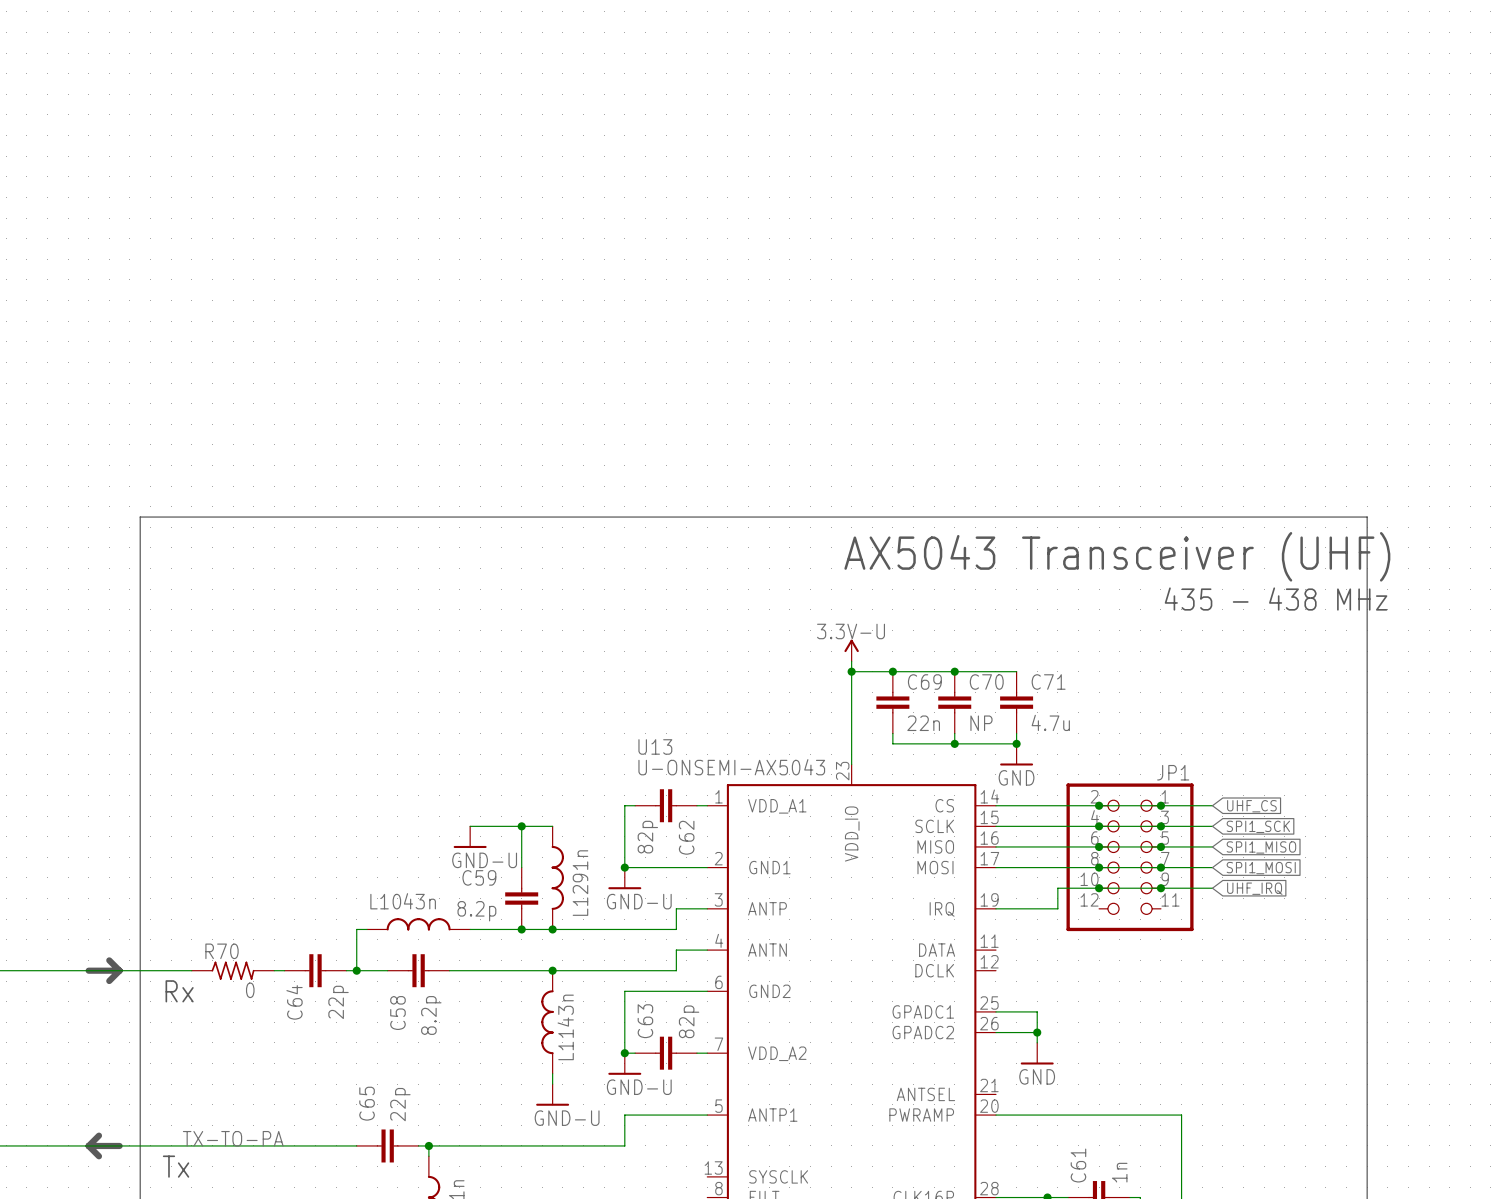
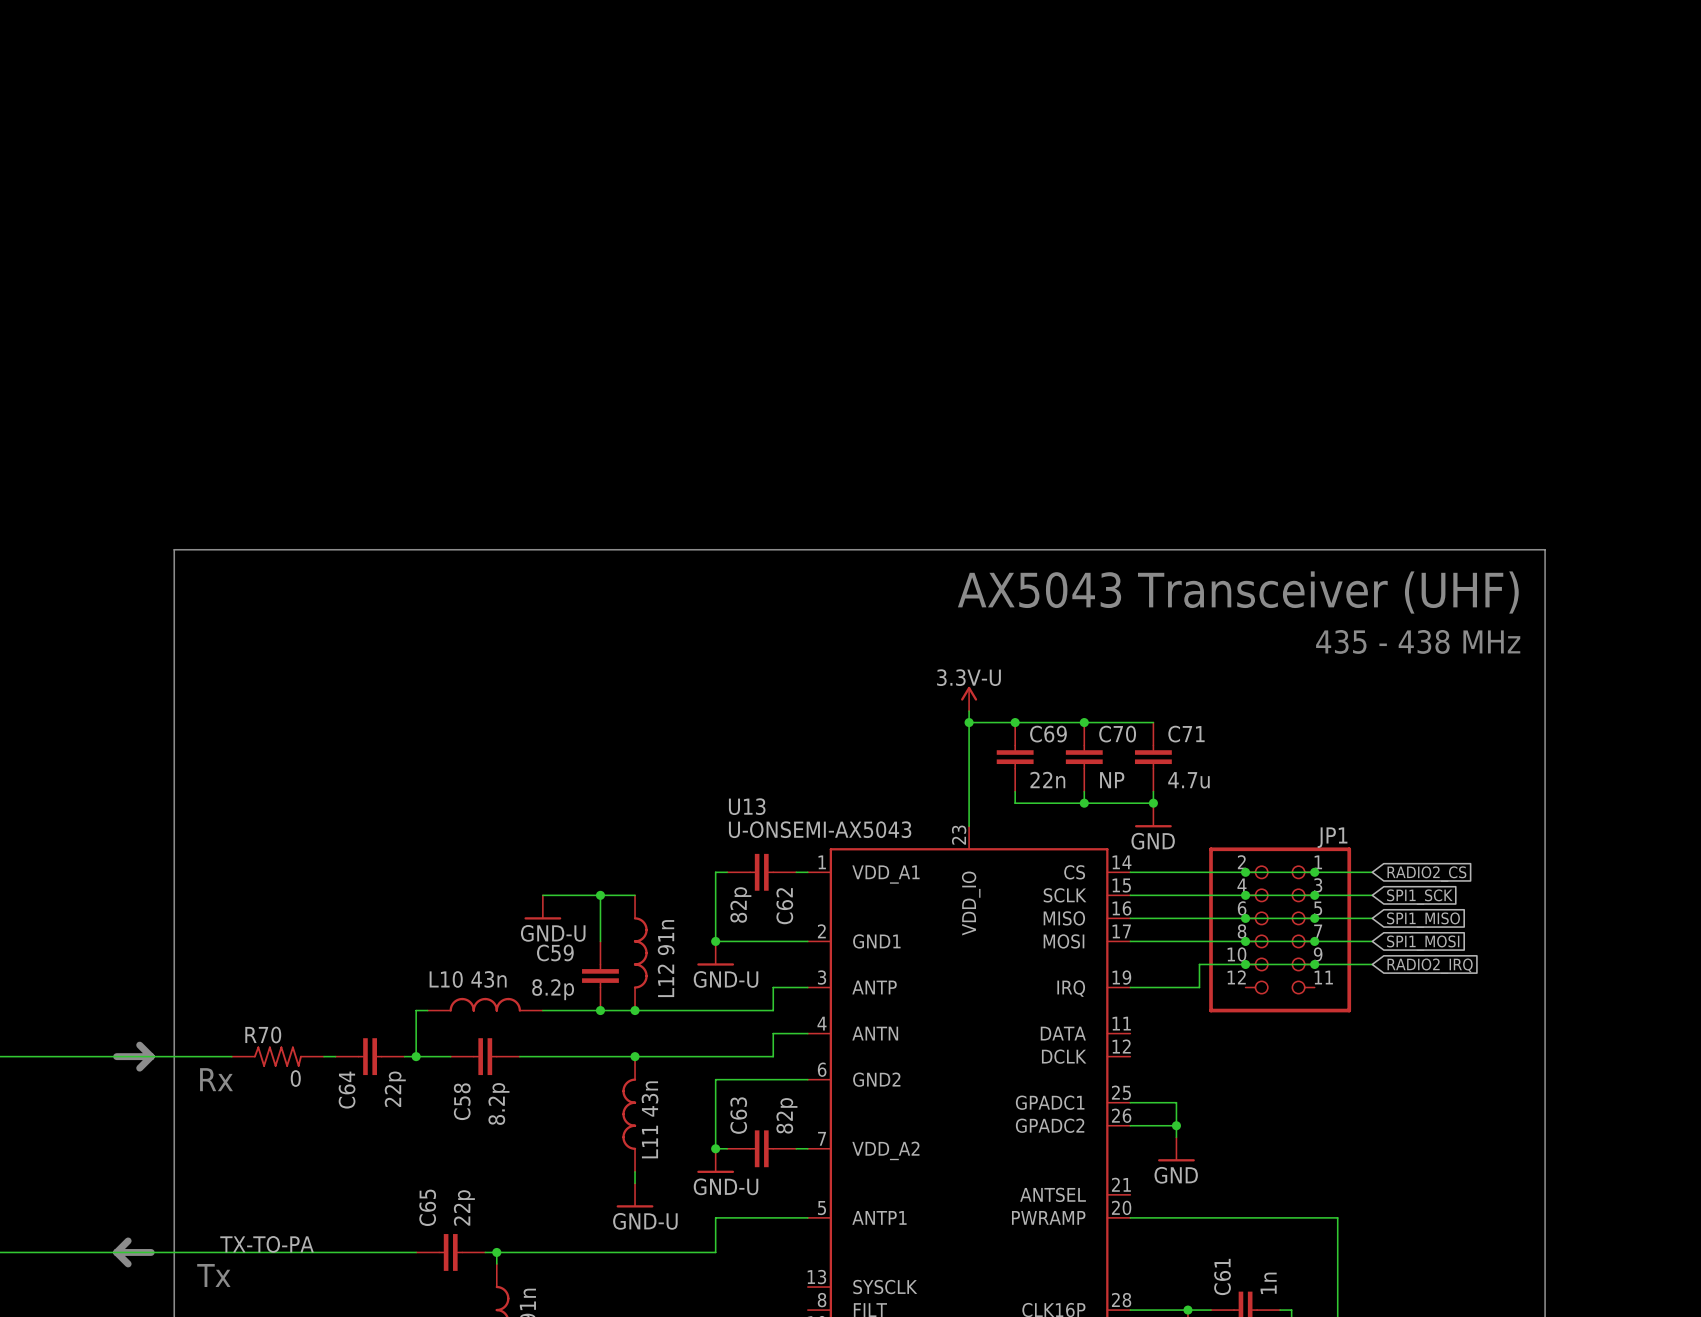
global label: UHF_CS (1251, 806) -> RADIO2_CS (1426, 874)
global label: UHF_IRQ (1254, 888) -> RADIO2_IRQ (1430, 966)

